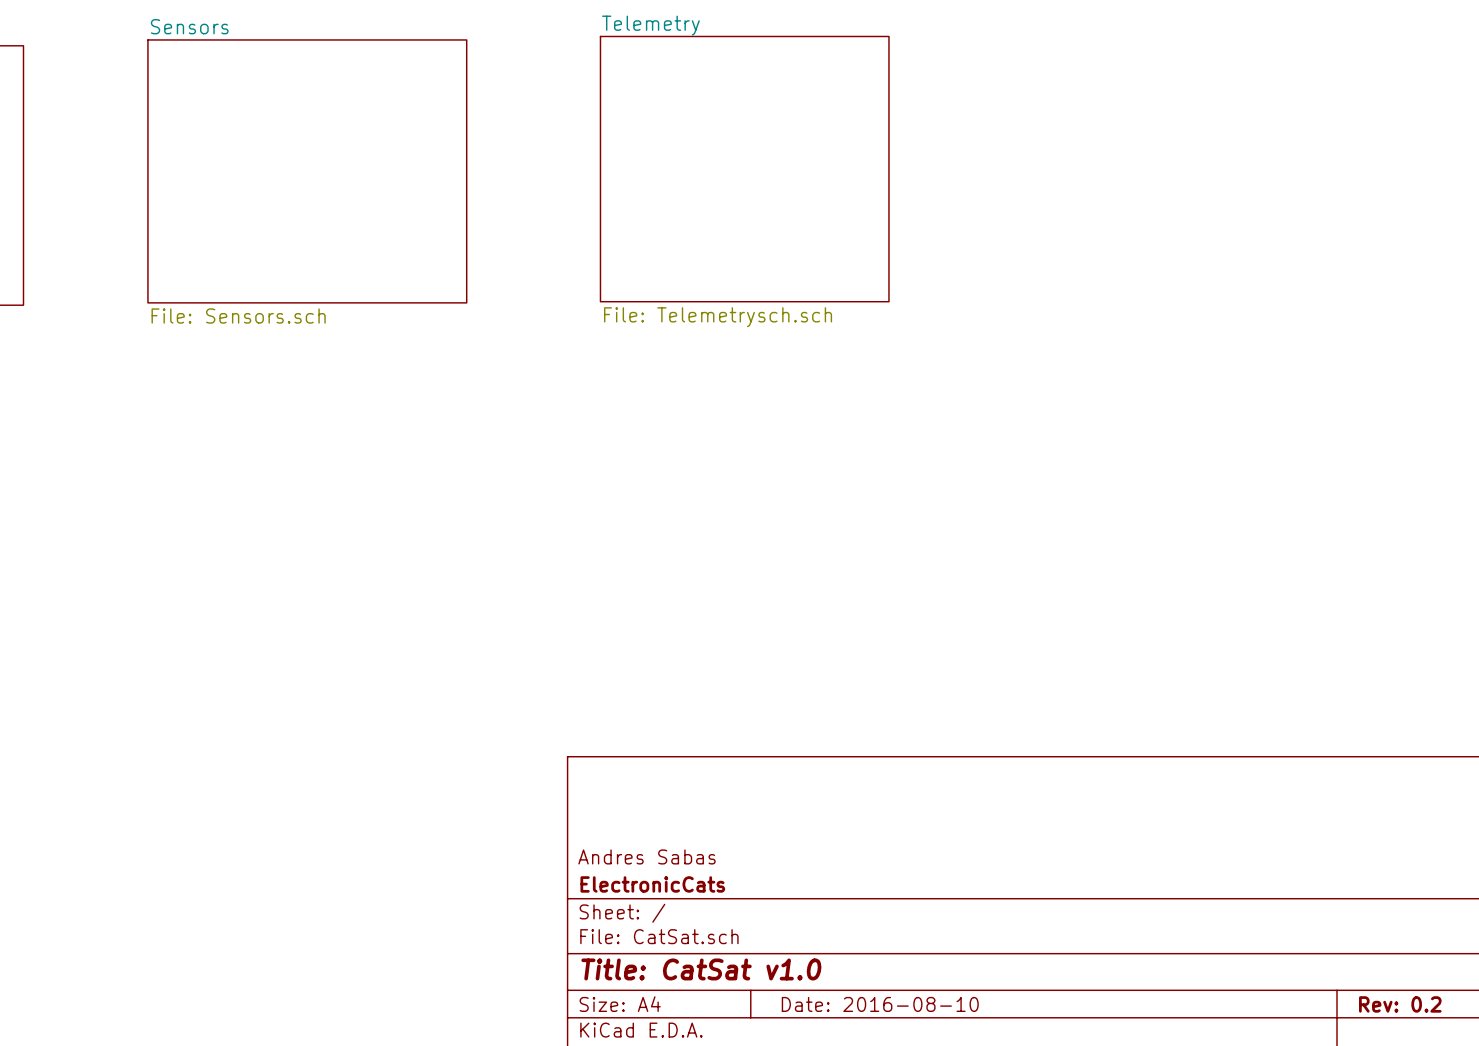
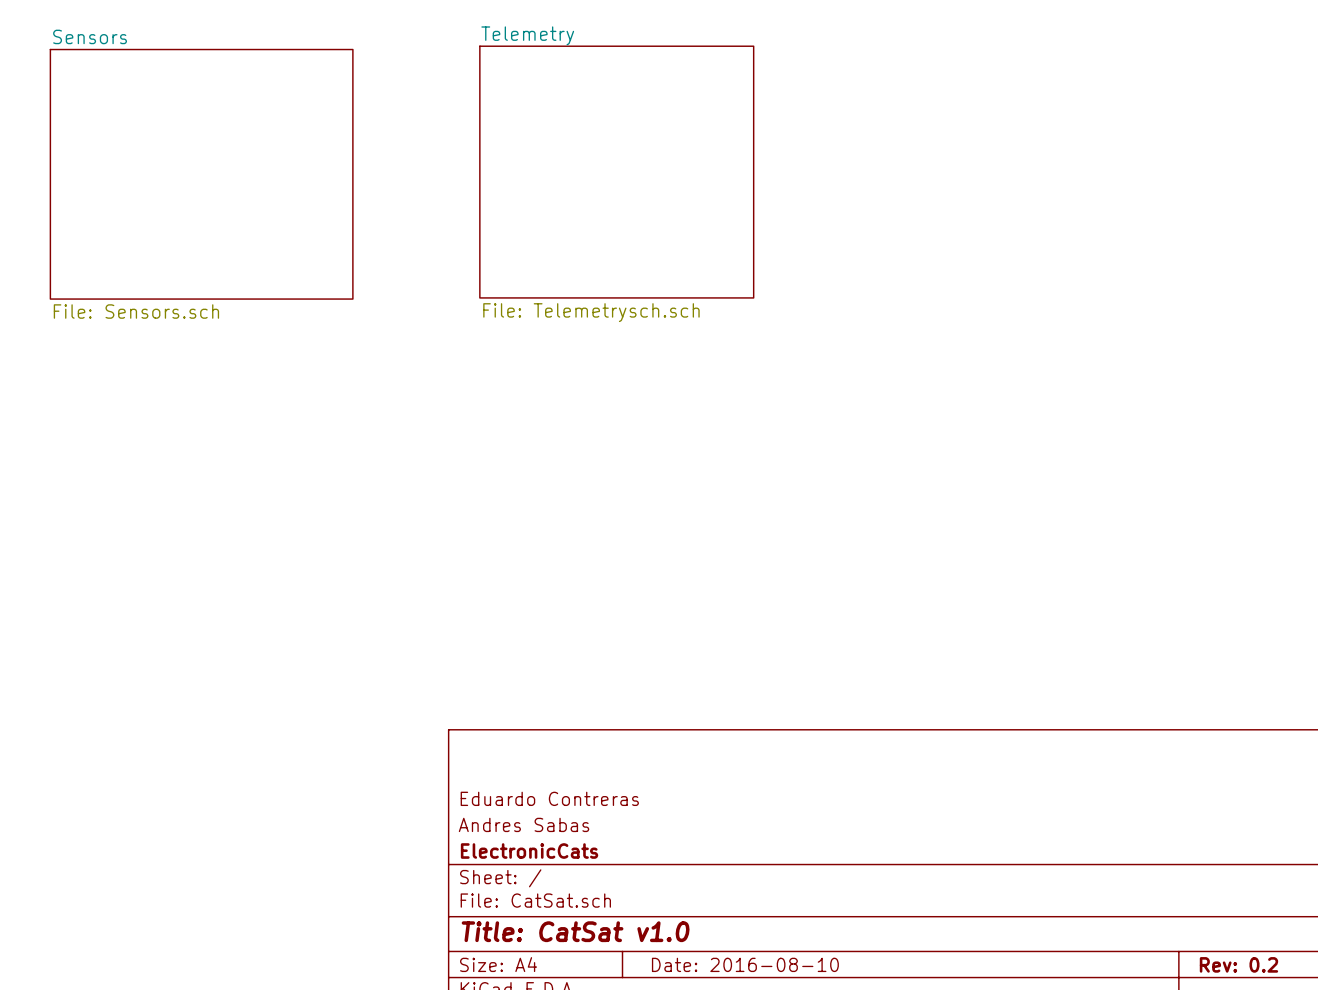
title block: none -> Eduardo Contreras (549, 798)

